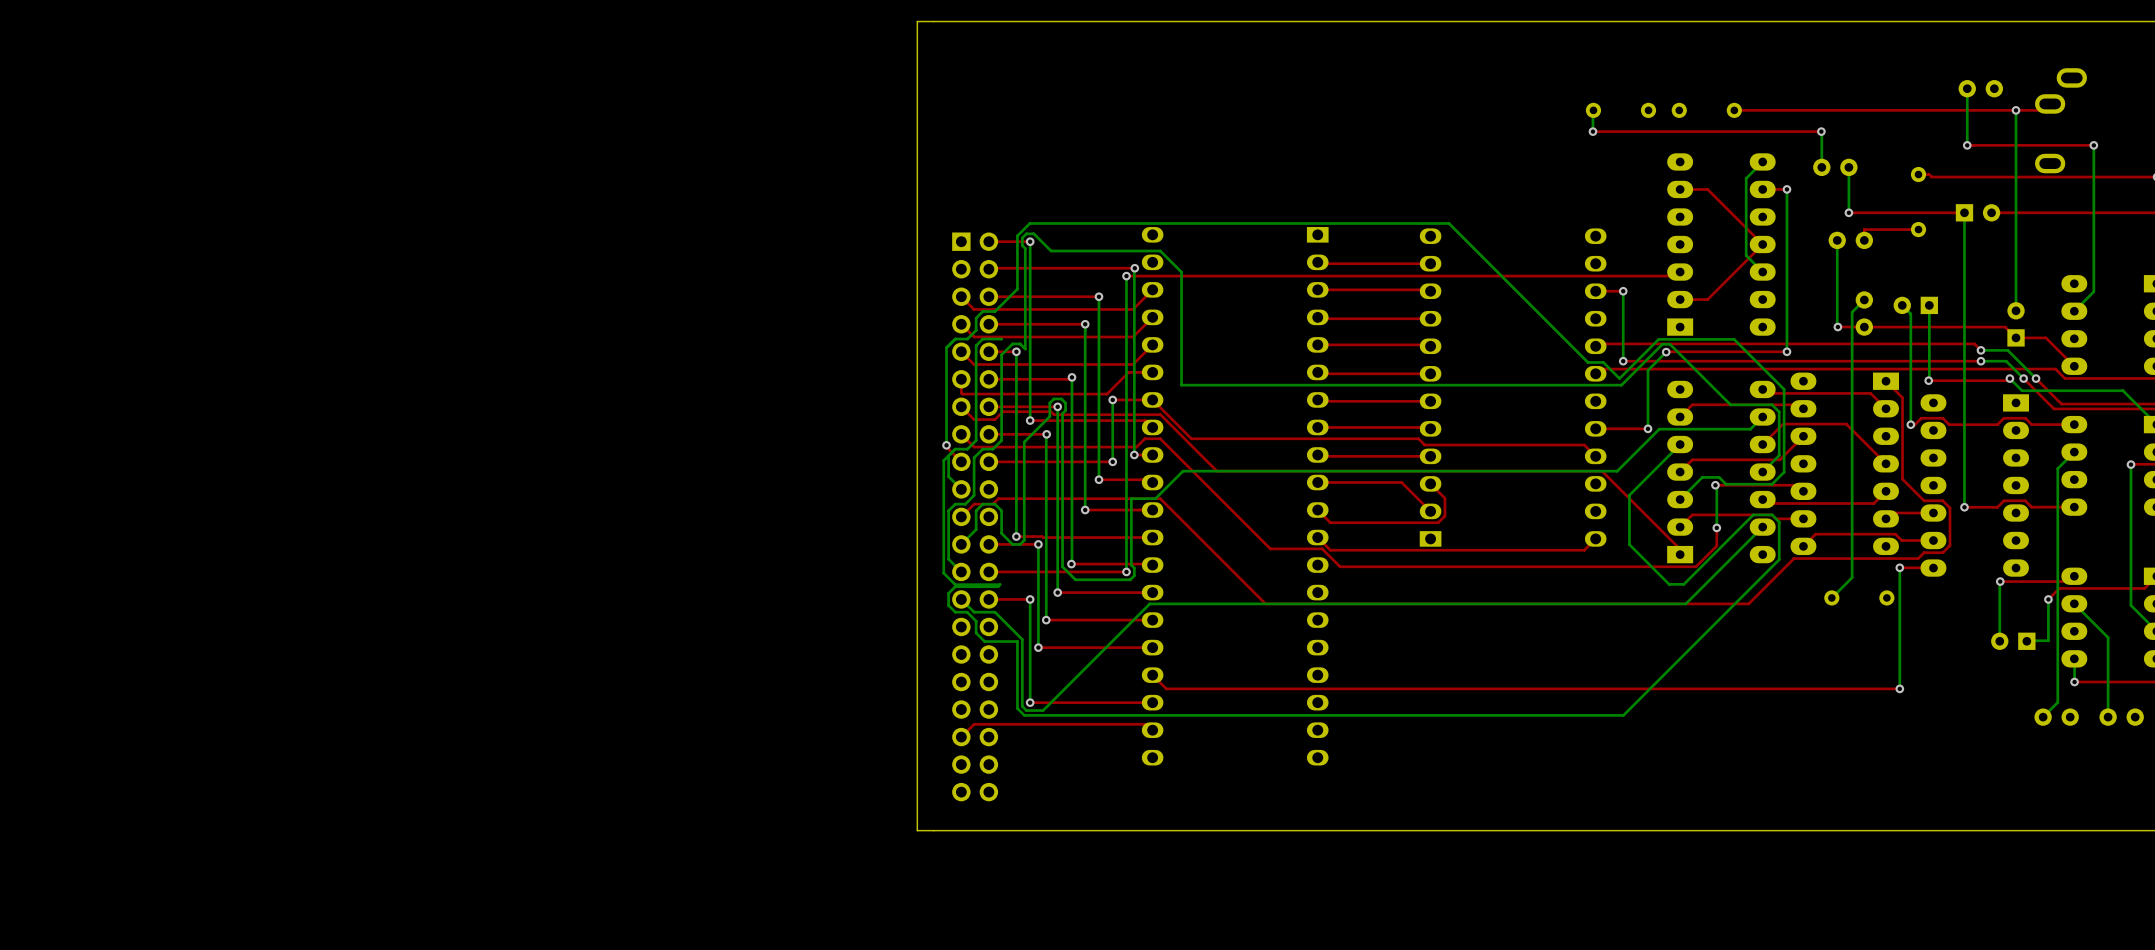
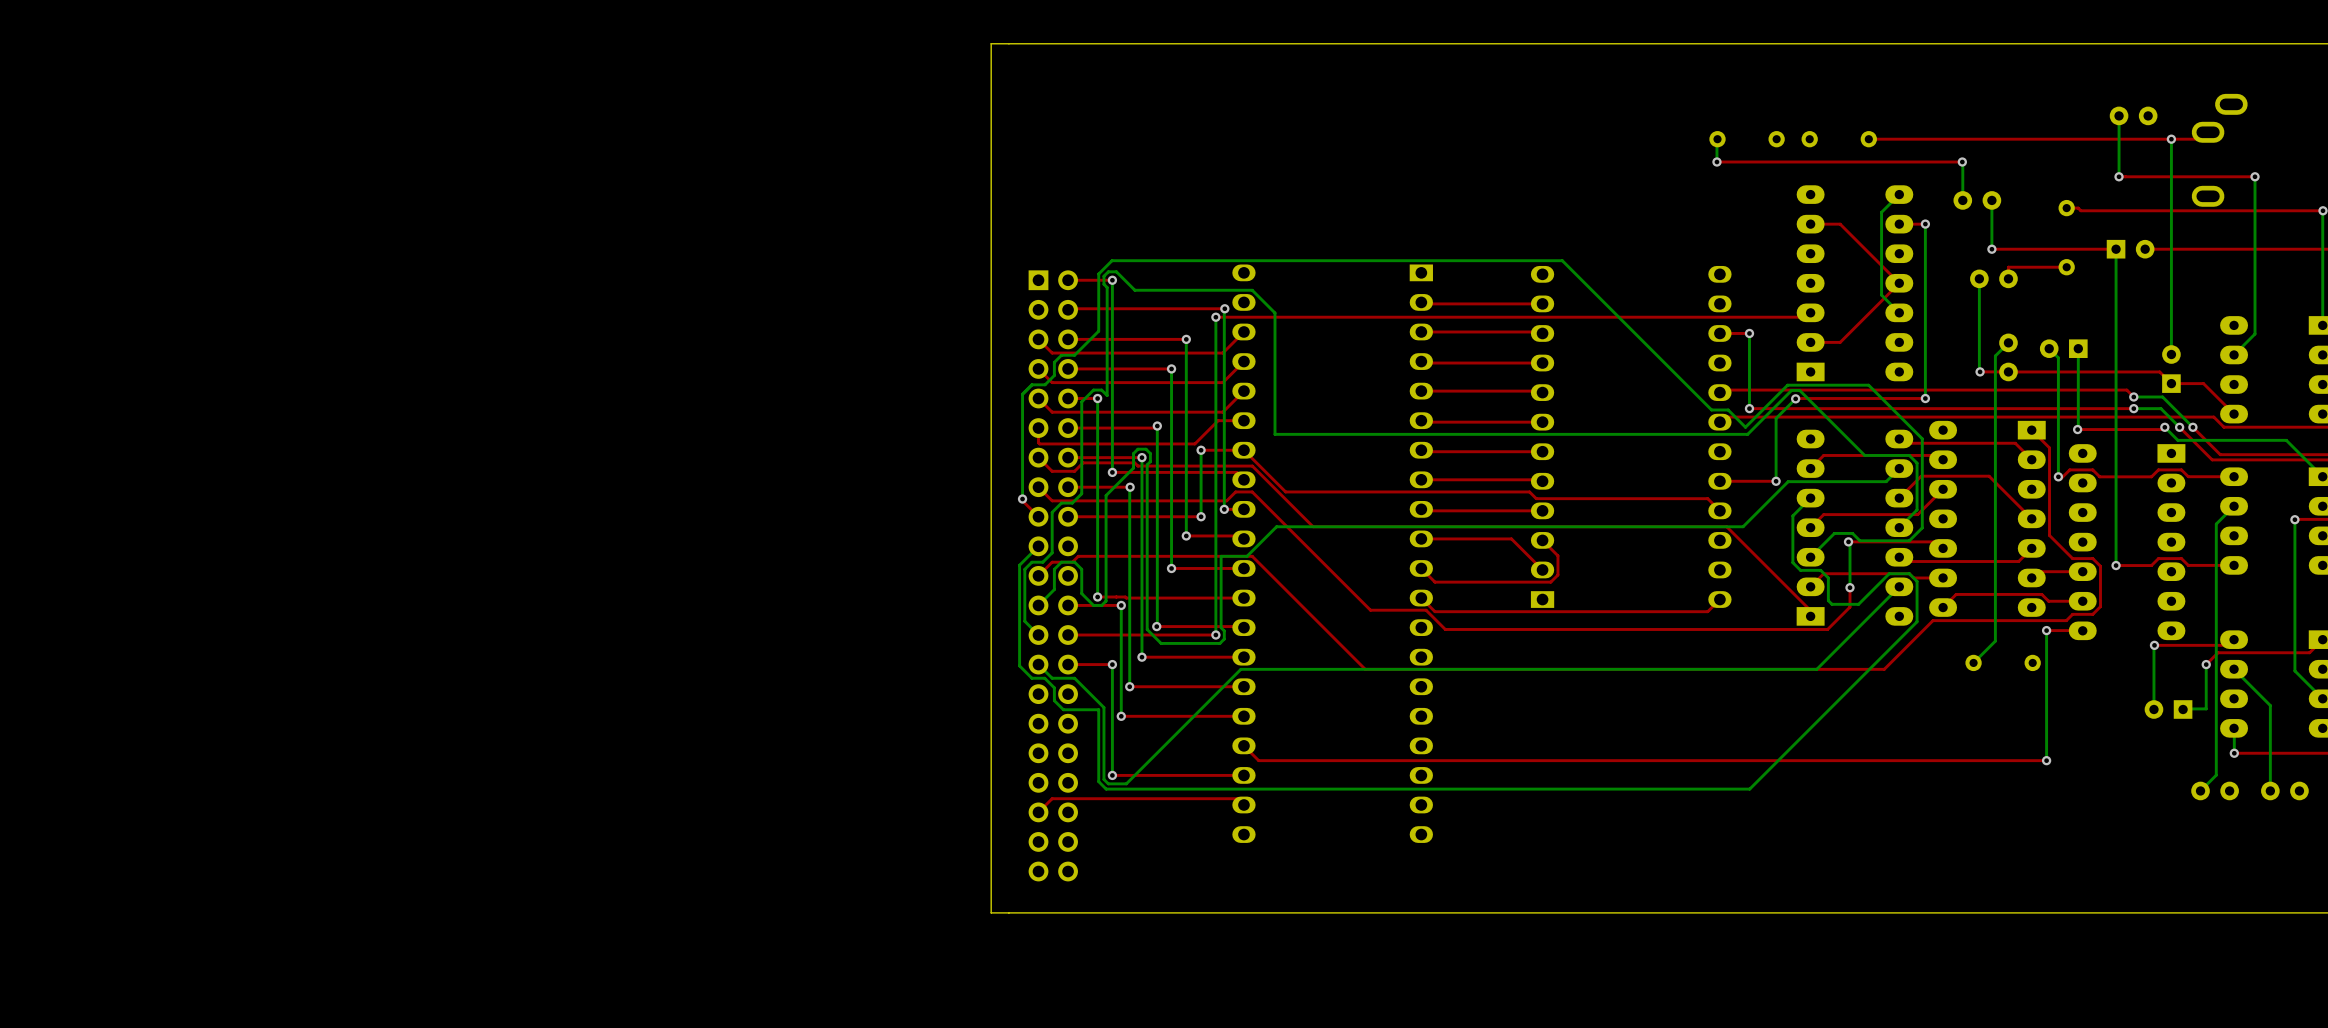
bottom track: (1001, 339) (982, 339) (976, 345) (976, 440) (967, 449) (955, 449) (943, 460) (943, 506) -> none
bottom track: (948, 455) (948, 476) (961, 489) -> (1019, 565) (1038, 546)
bottom track: (1663, 461) (1629, 495) (1629, 544) (1669, 584) (1683, 584) (1724, 543) -> (1792, 515) (1792, 562) (1800, 570) (1820, 570) (1828, 578) (1828, 600) (1832, 604) (1858, 604)
bottom track: (943, 573) (955, 584) (1000, 584) (997, 586) (955, 586) (948, 593) (948, 605) -> (1019, 636) (1019, 665) (1024, 671)

